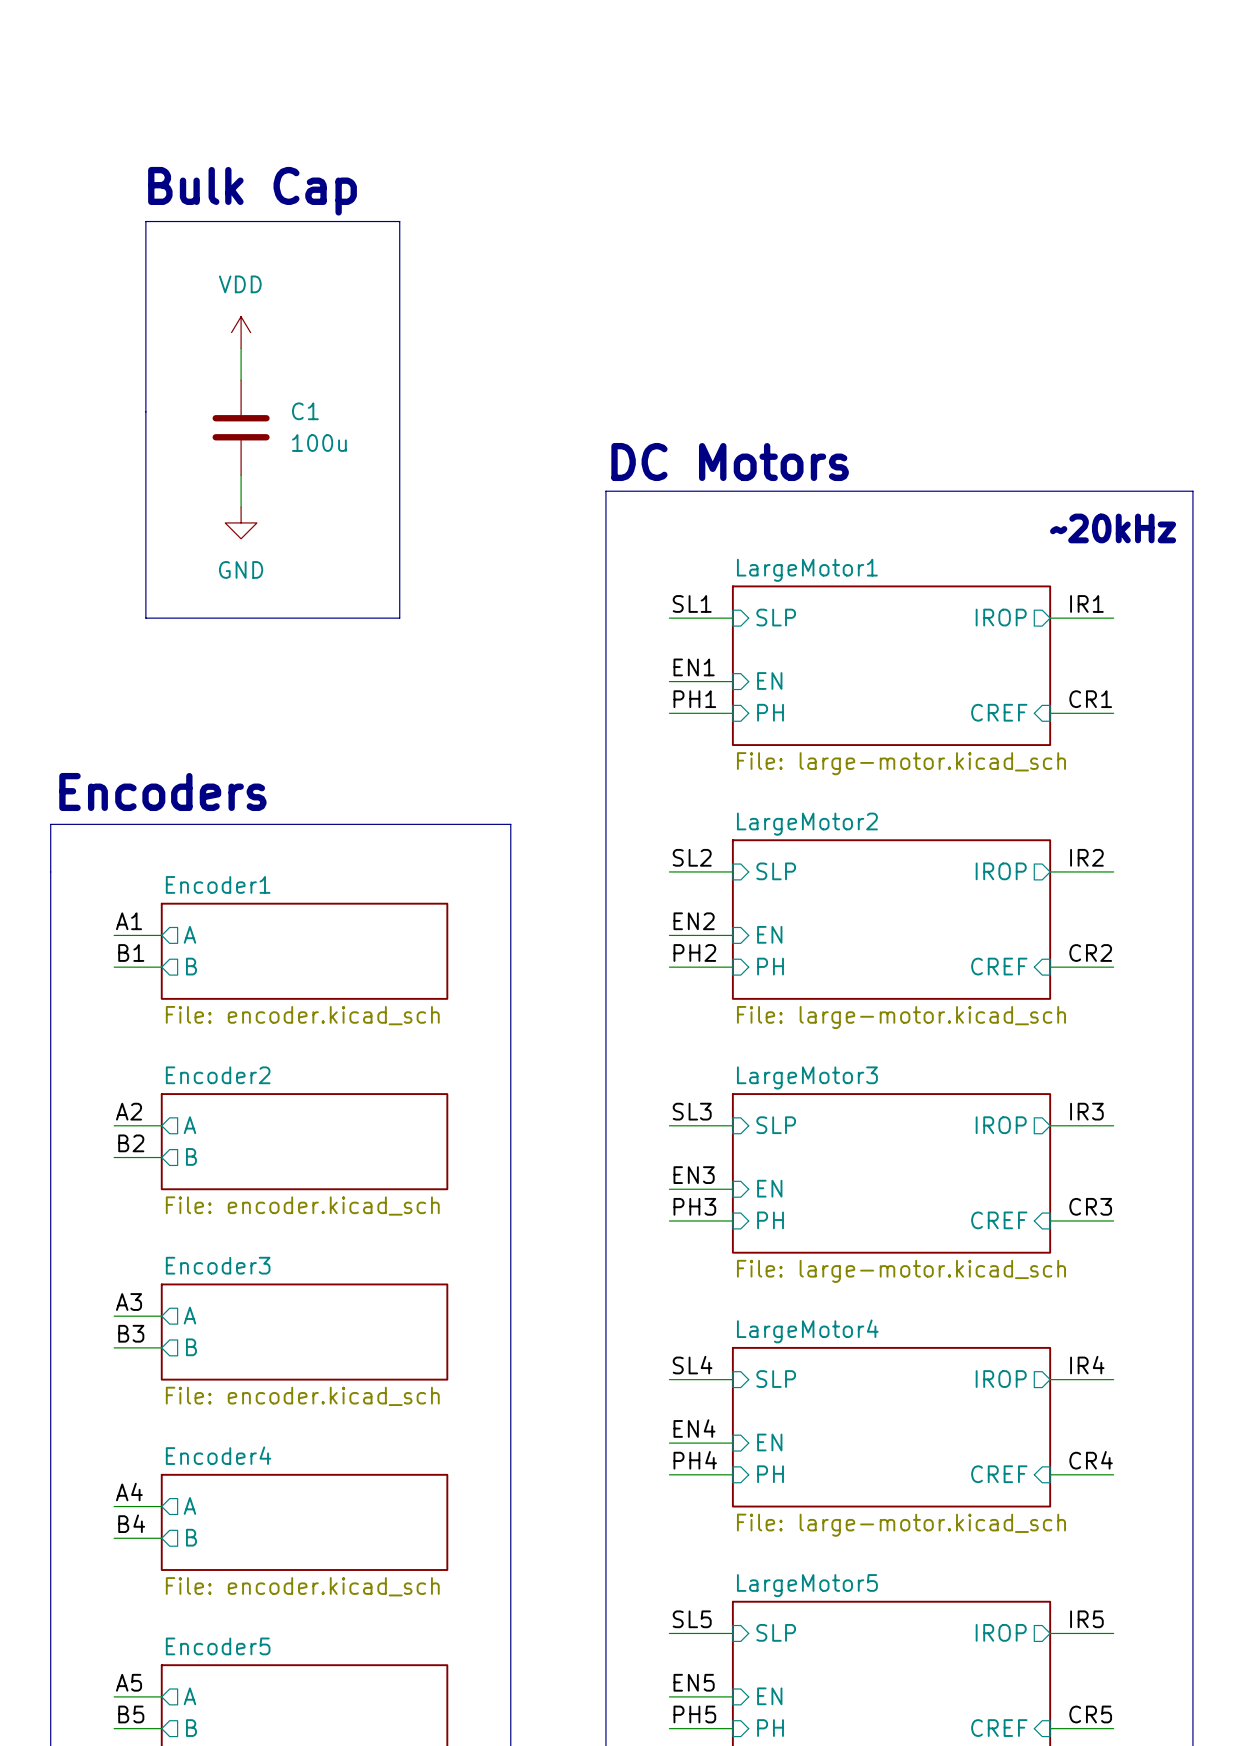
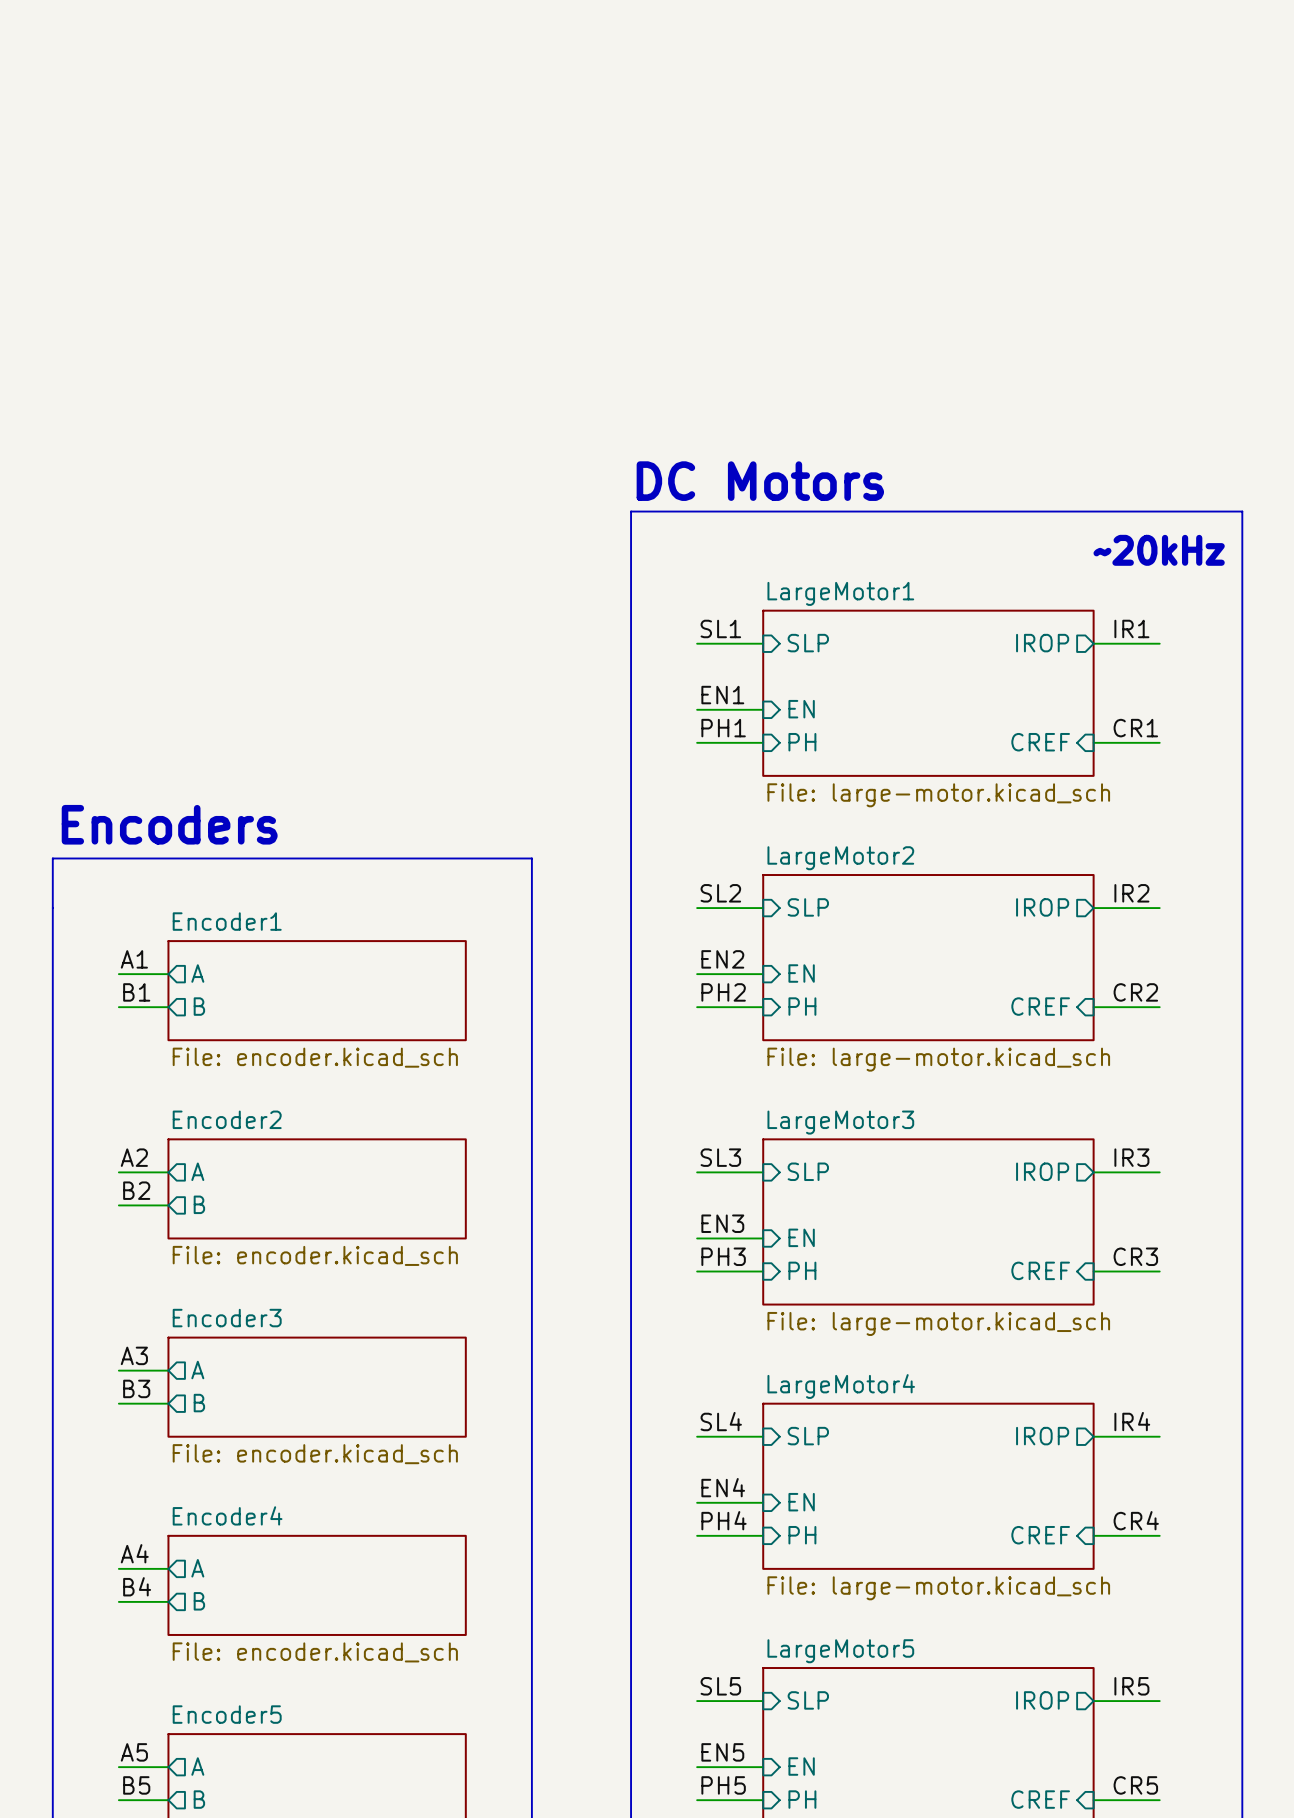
text: Bulk Cap (252, 191) -> none
line: (145, 221) (145, 618) (399, 618) (399, 221) (145, 221) -> none
power symbol: VDD (241, 332) -> none
wire: (241, 348) (241, 380) -> none
C1: 100u (241, 427) -> none
wire: (241, 475) (241, 507) -> none
power symbol: GND (241, 522) -> none

